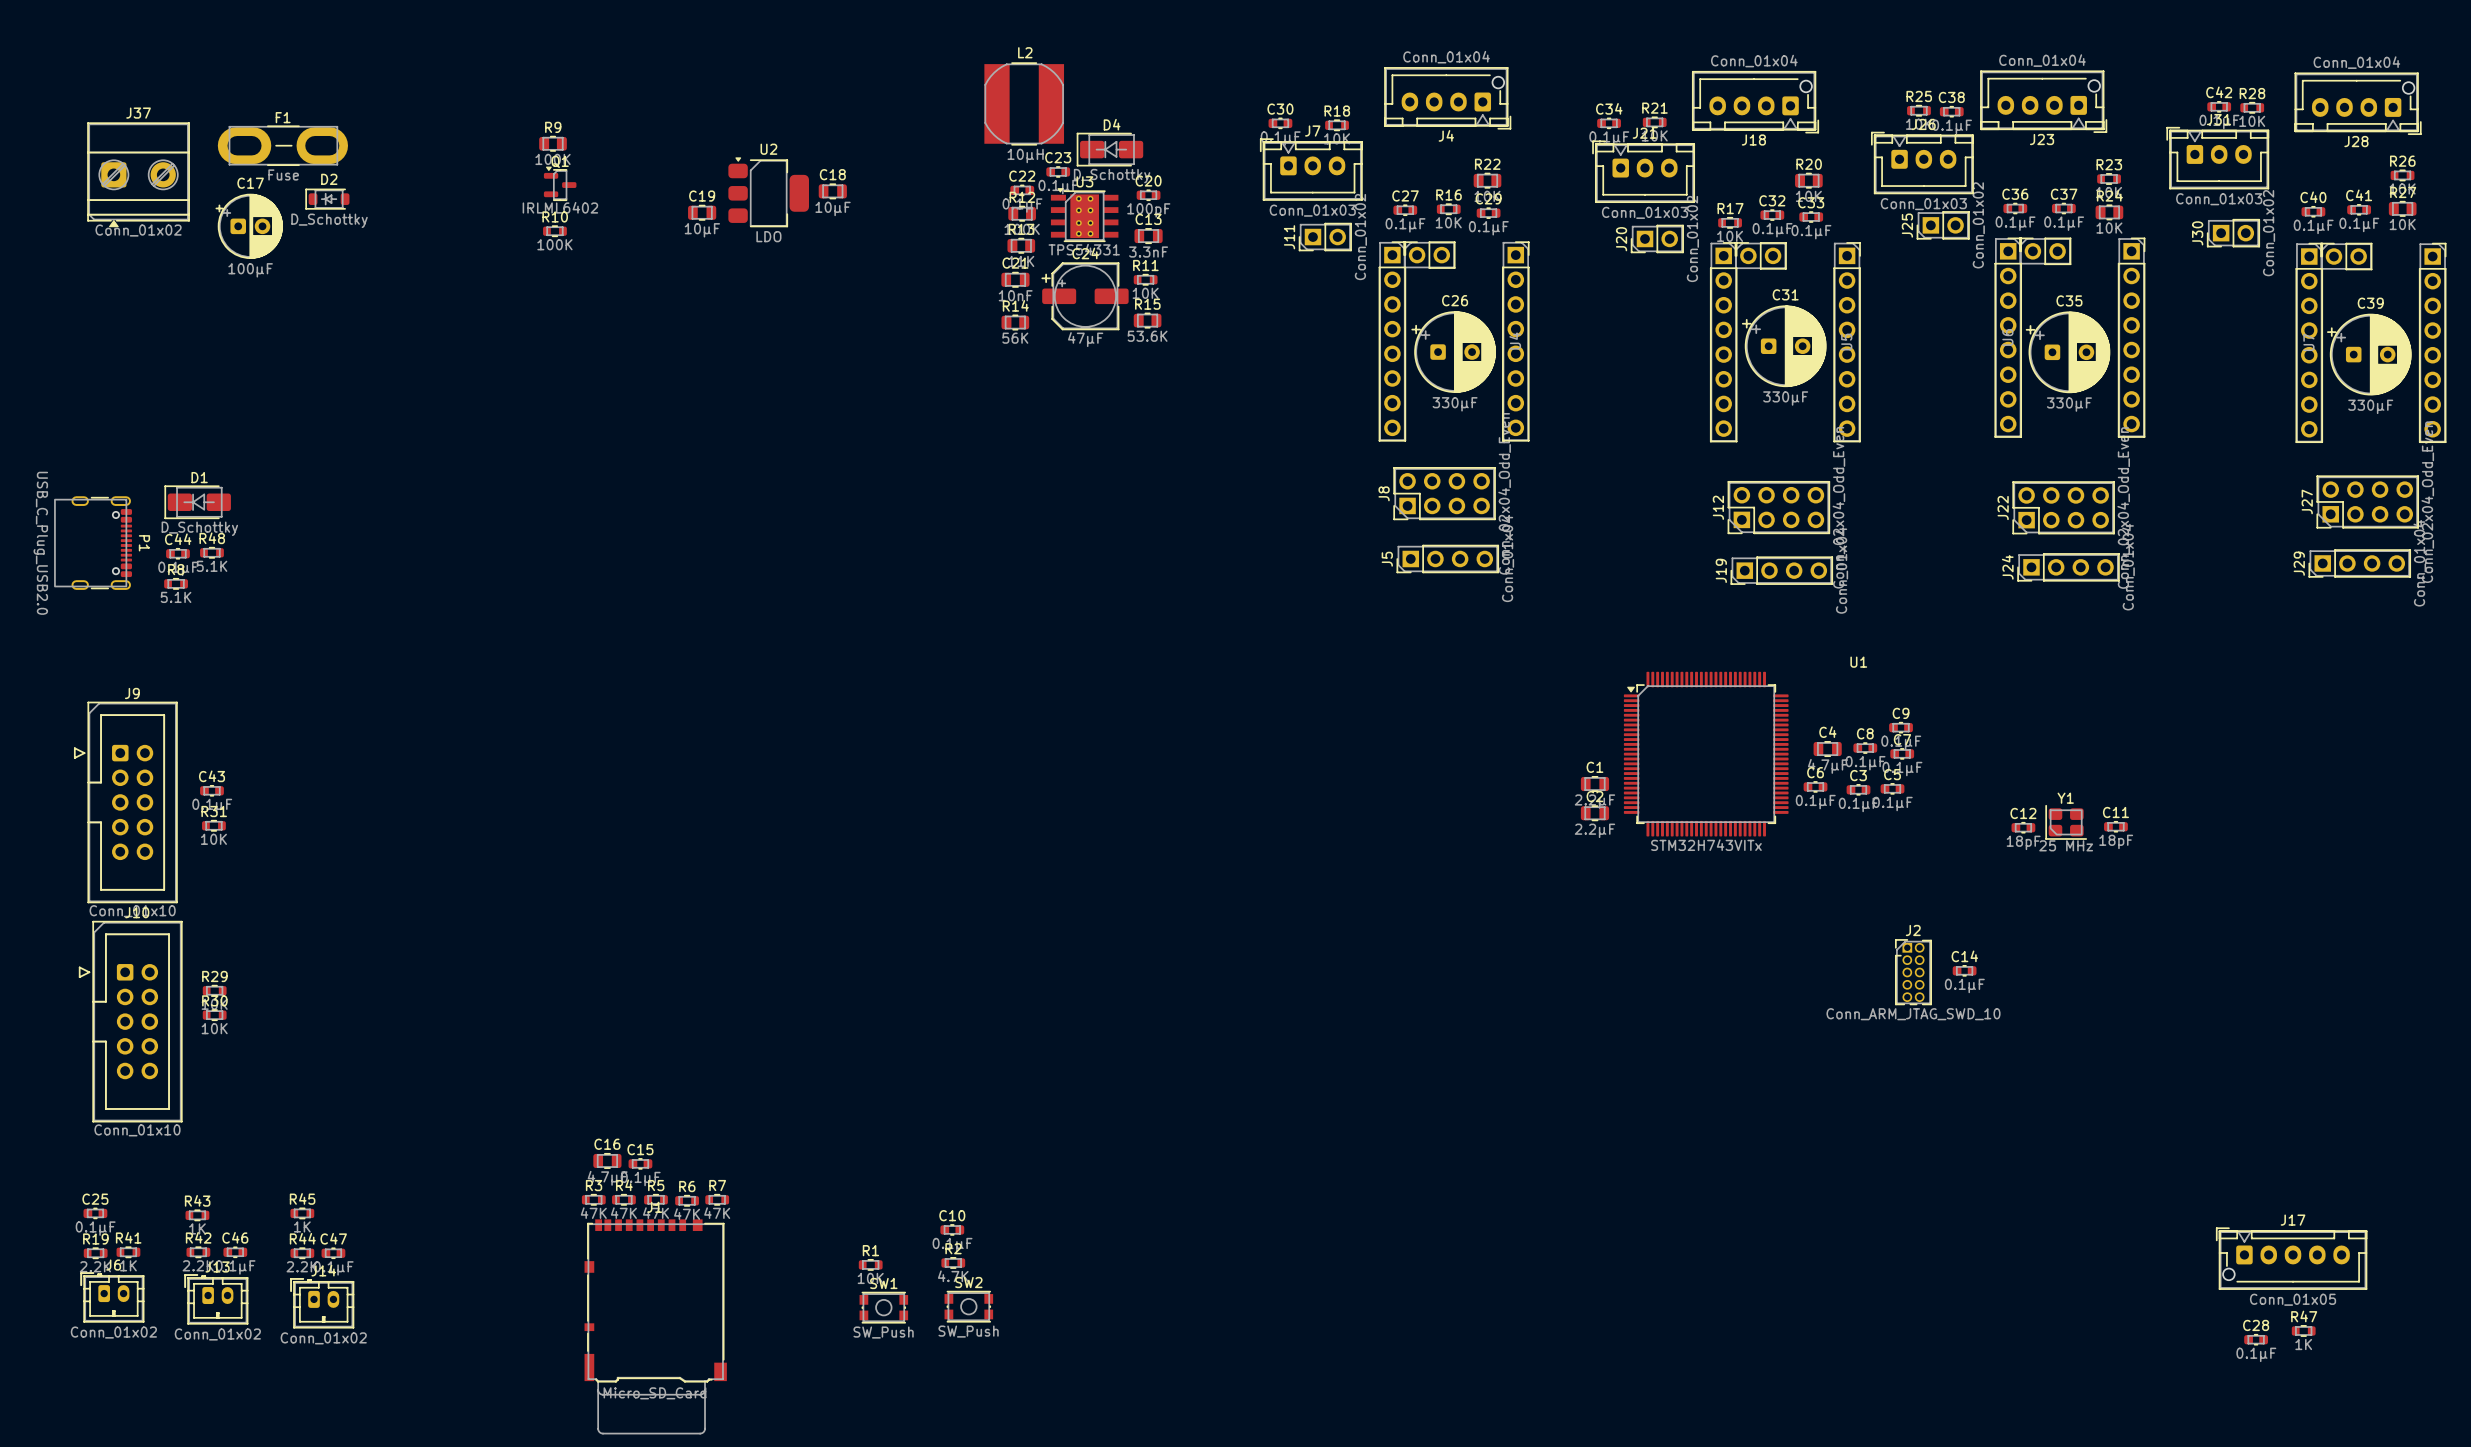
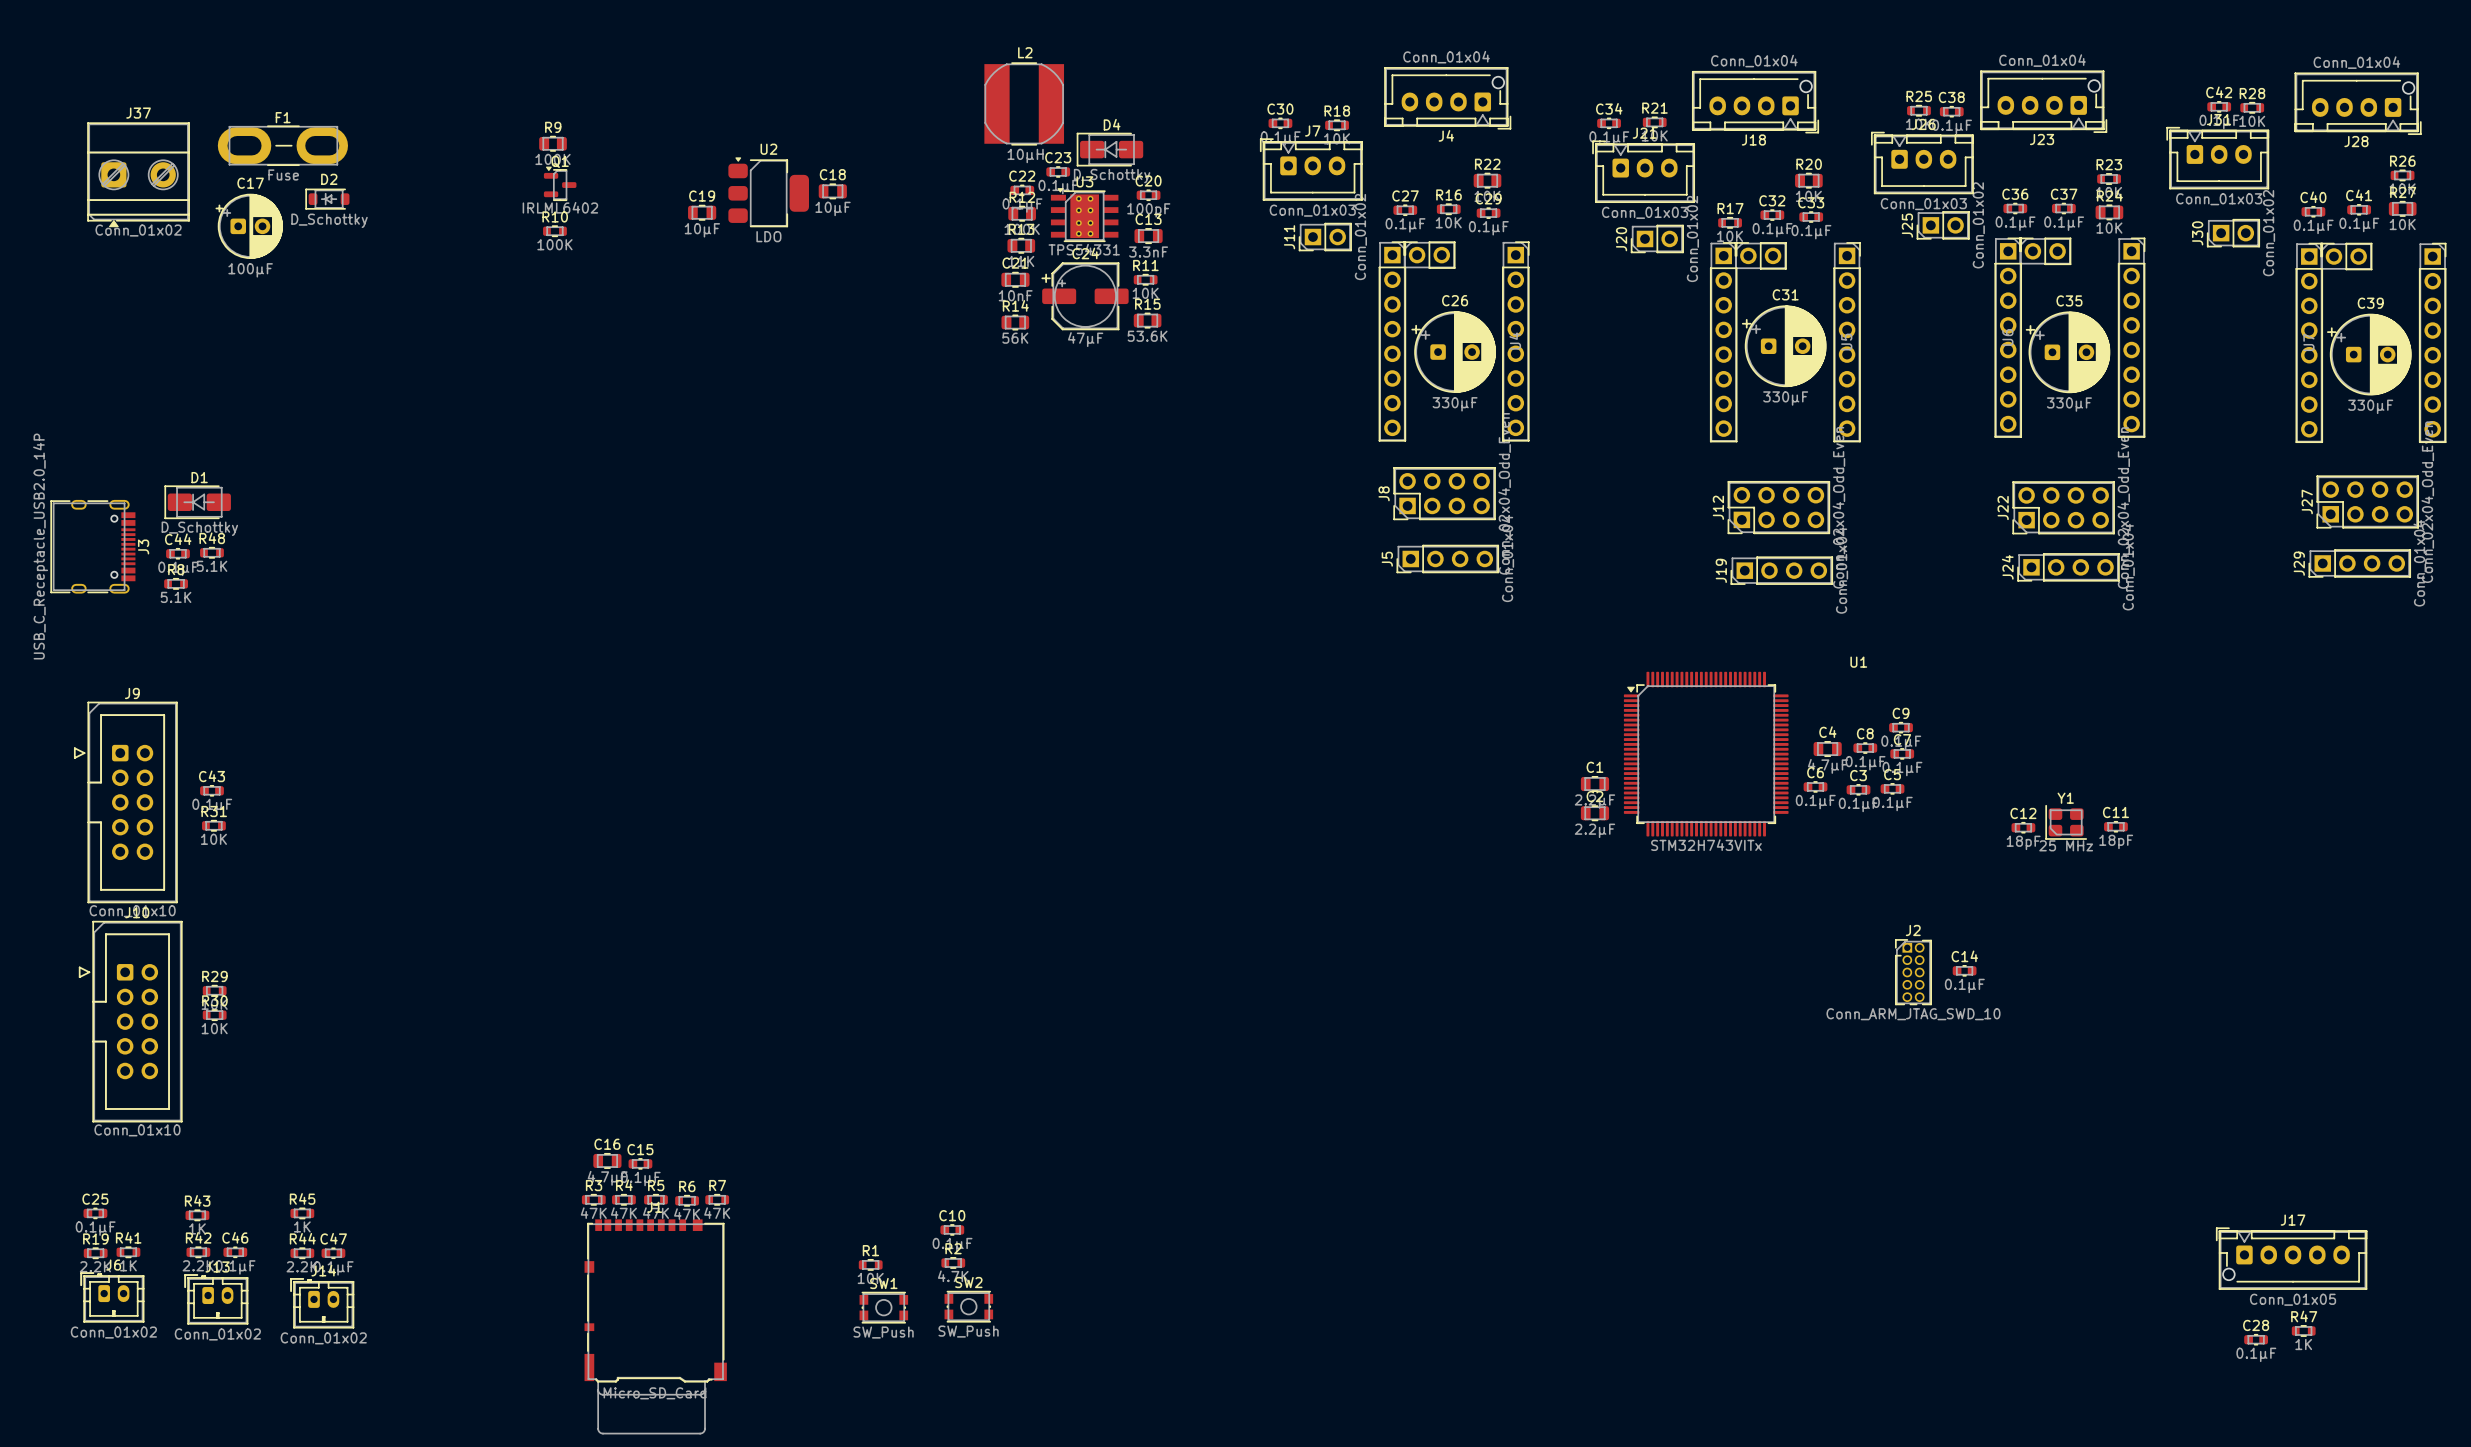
P1: USB_C_Plug_USB2.0 (93, 543) -> none
J3: none -> USB_C_Receptacle_USB2.0_14P (93, 546)

